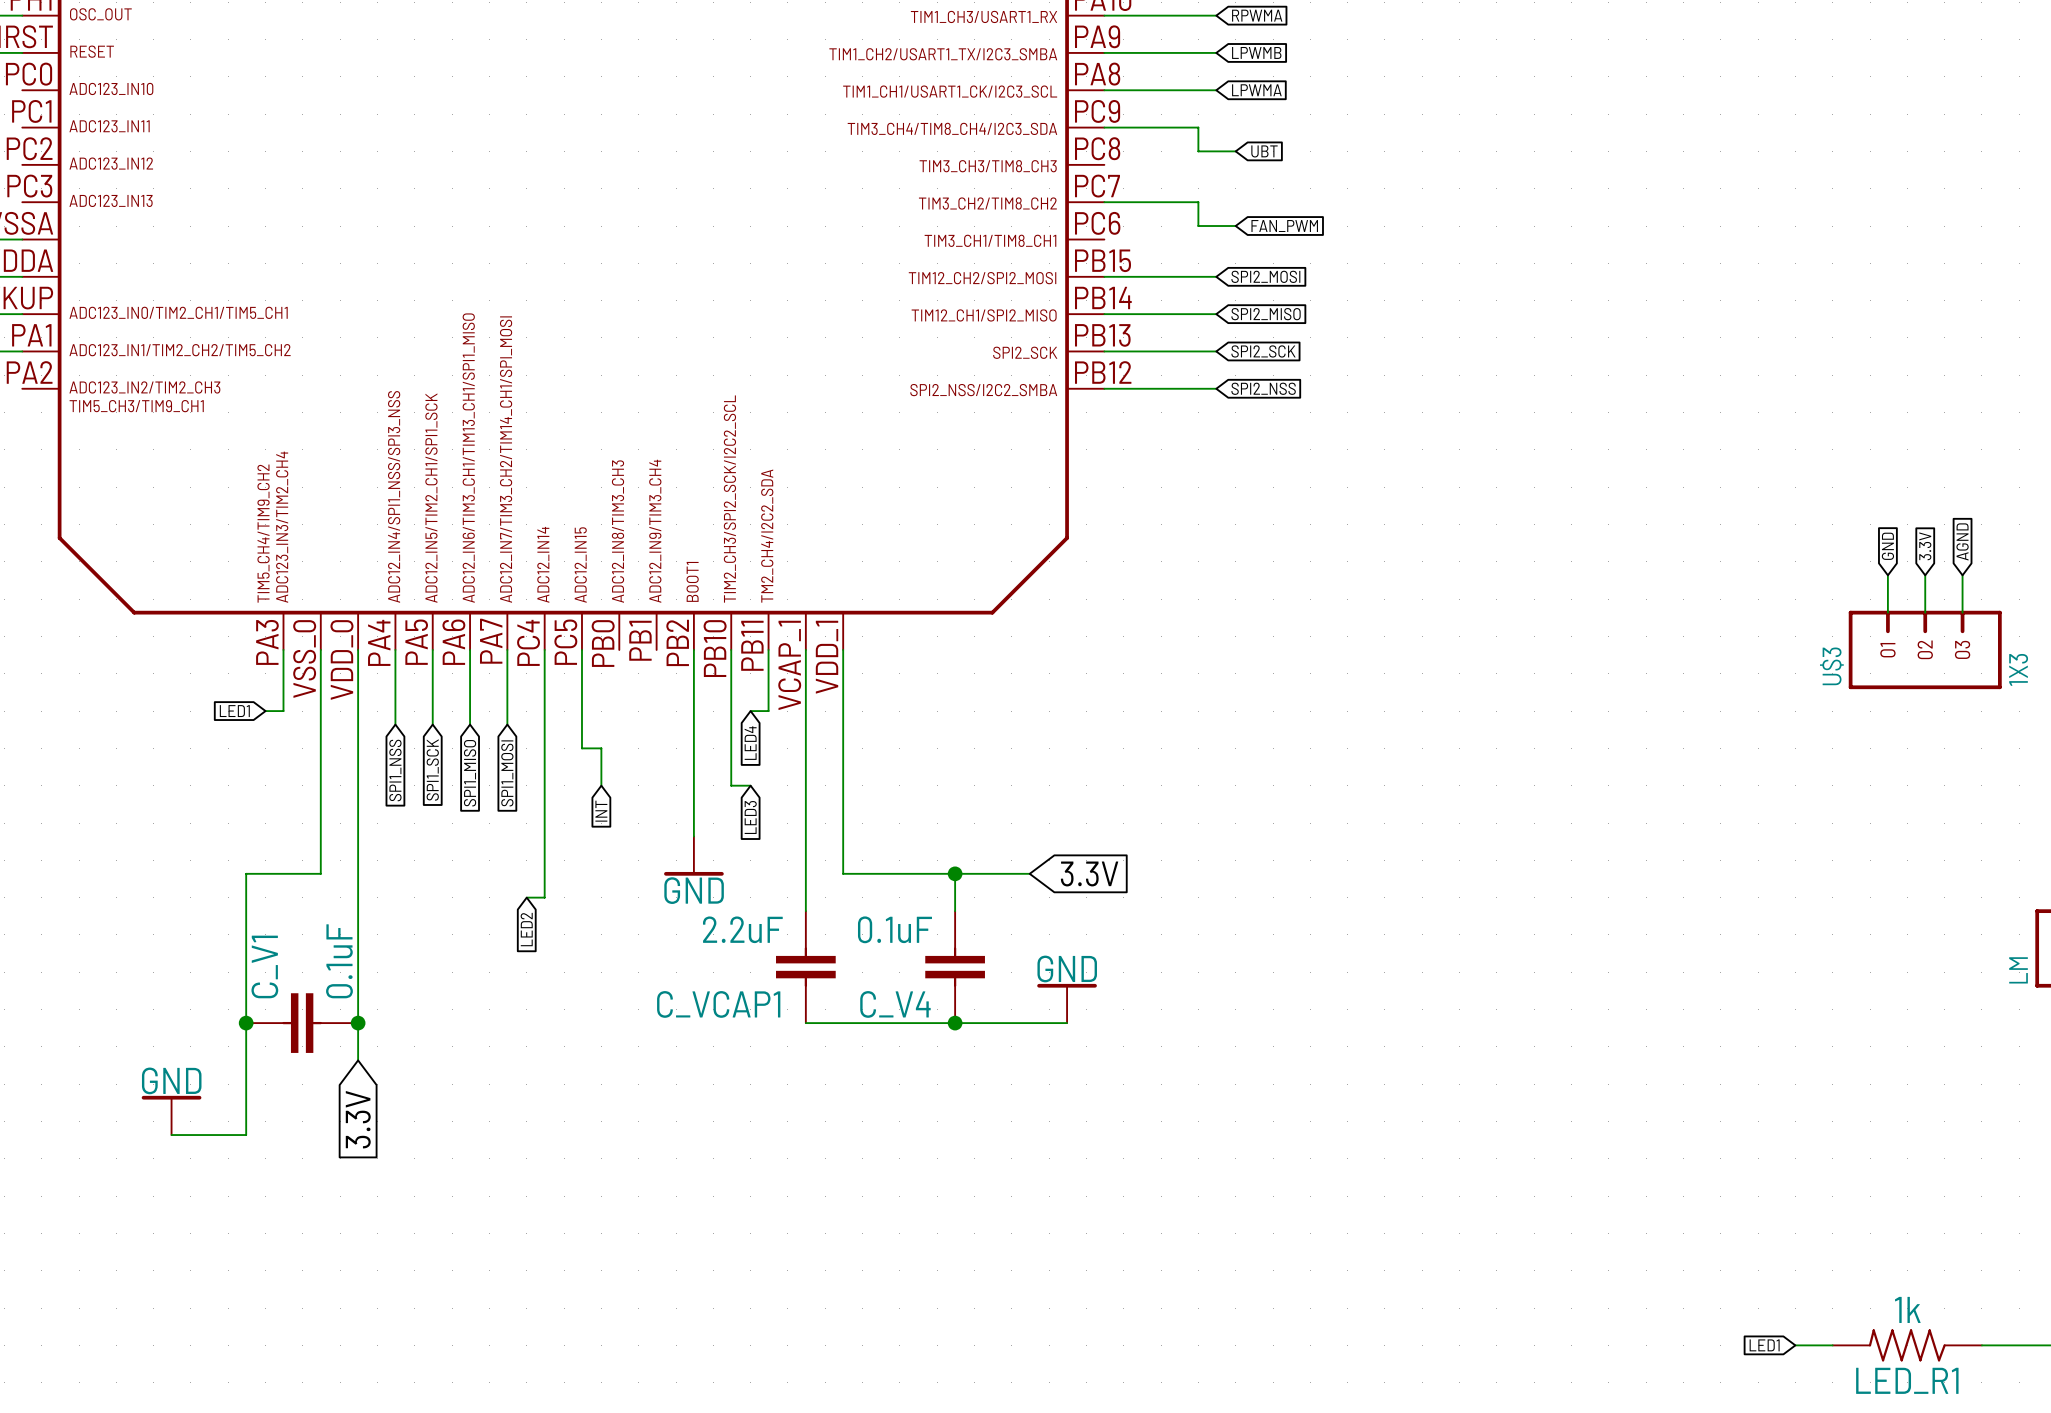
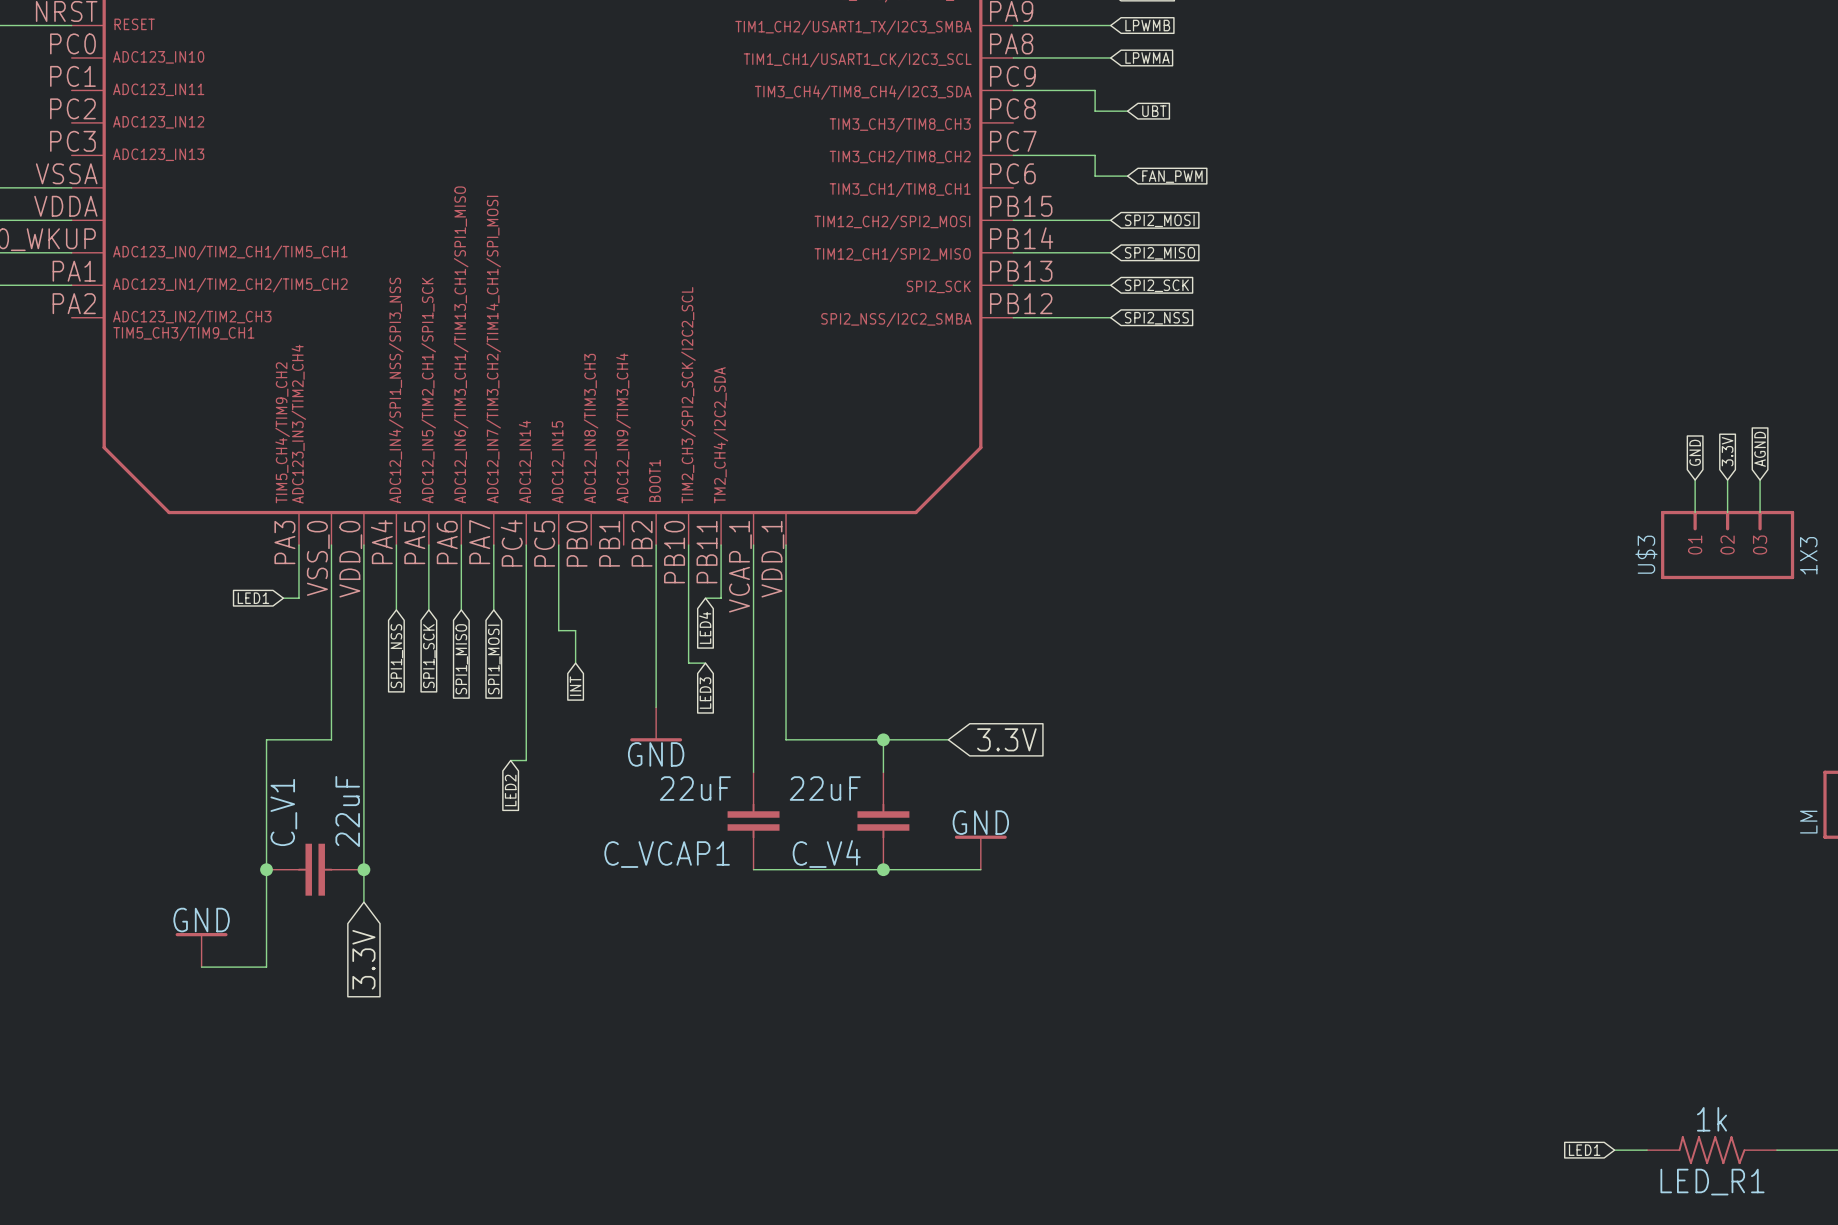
C_VCAP1 value: 2.2uF (742, 929) -> 22uF (695, 788)
C_V4 value: 0.1uF (894, 929) -> 22uF (825, 788)
C_V1 value: 0.1uF (339, 961) -> 22uF (347, 811)

